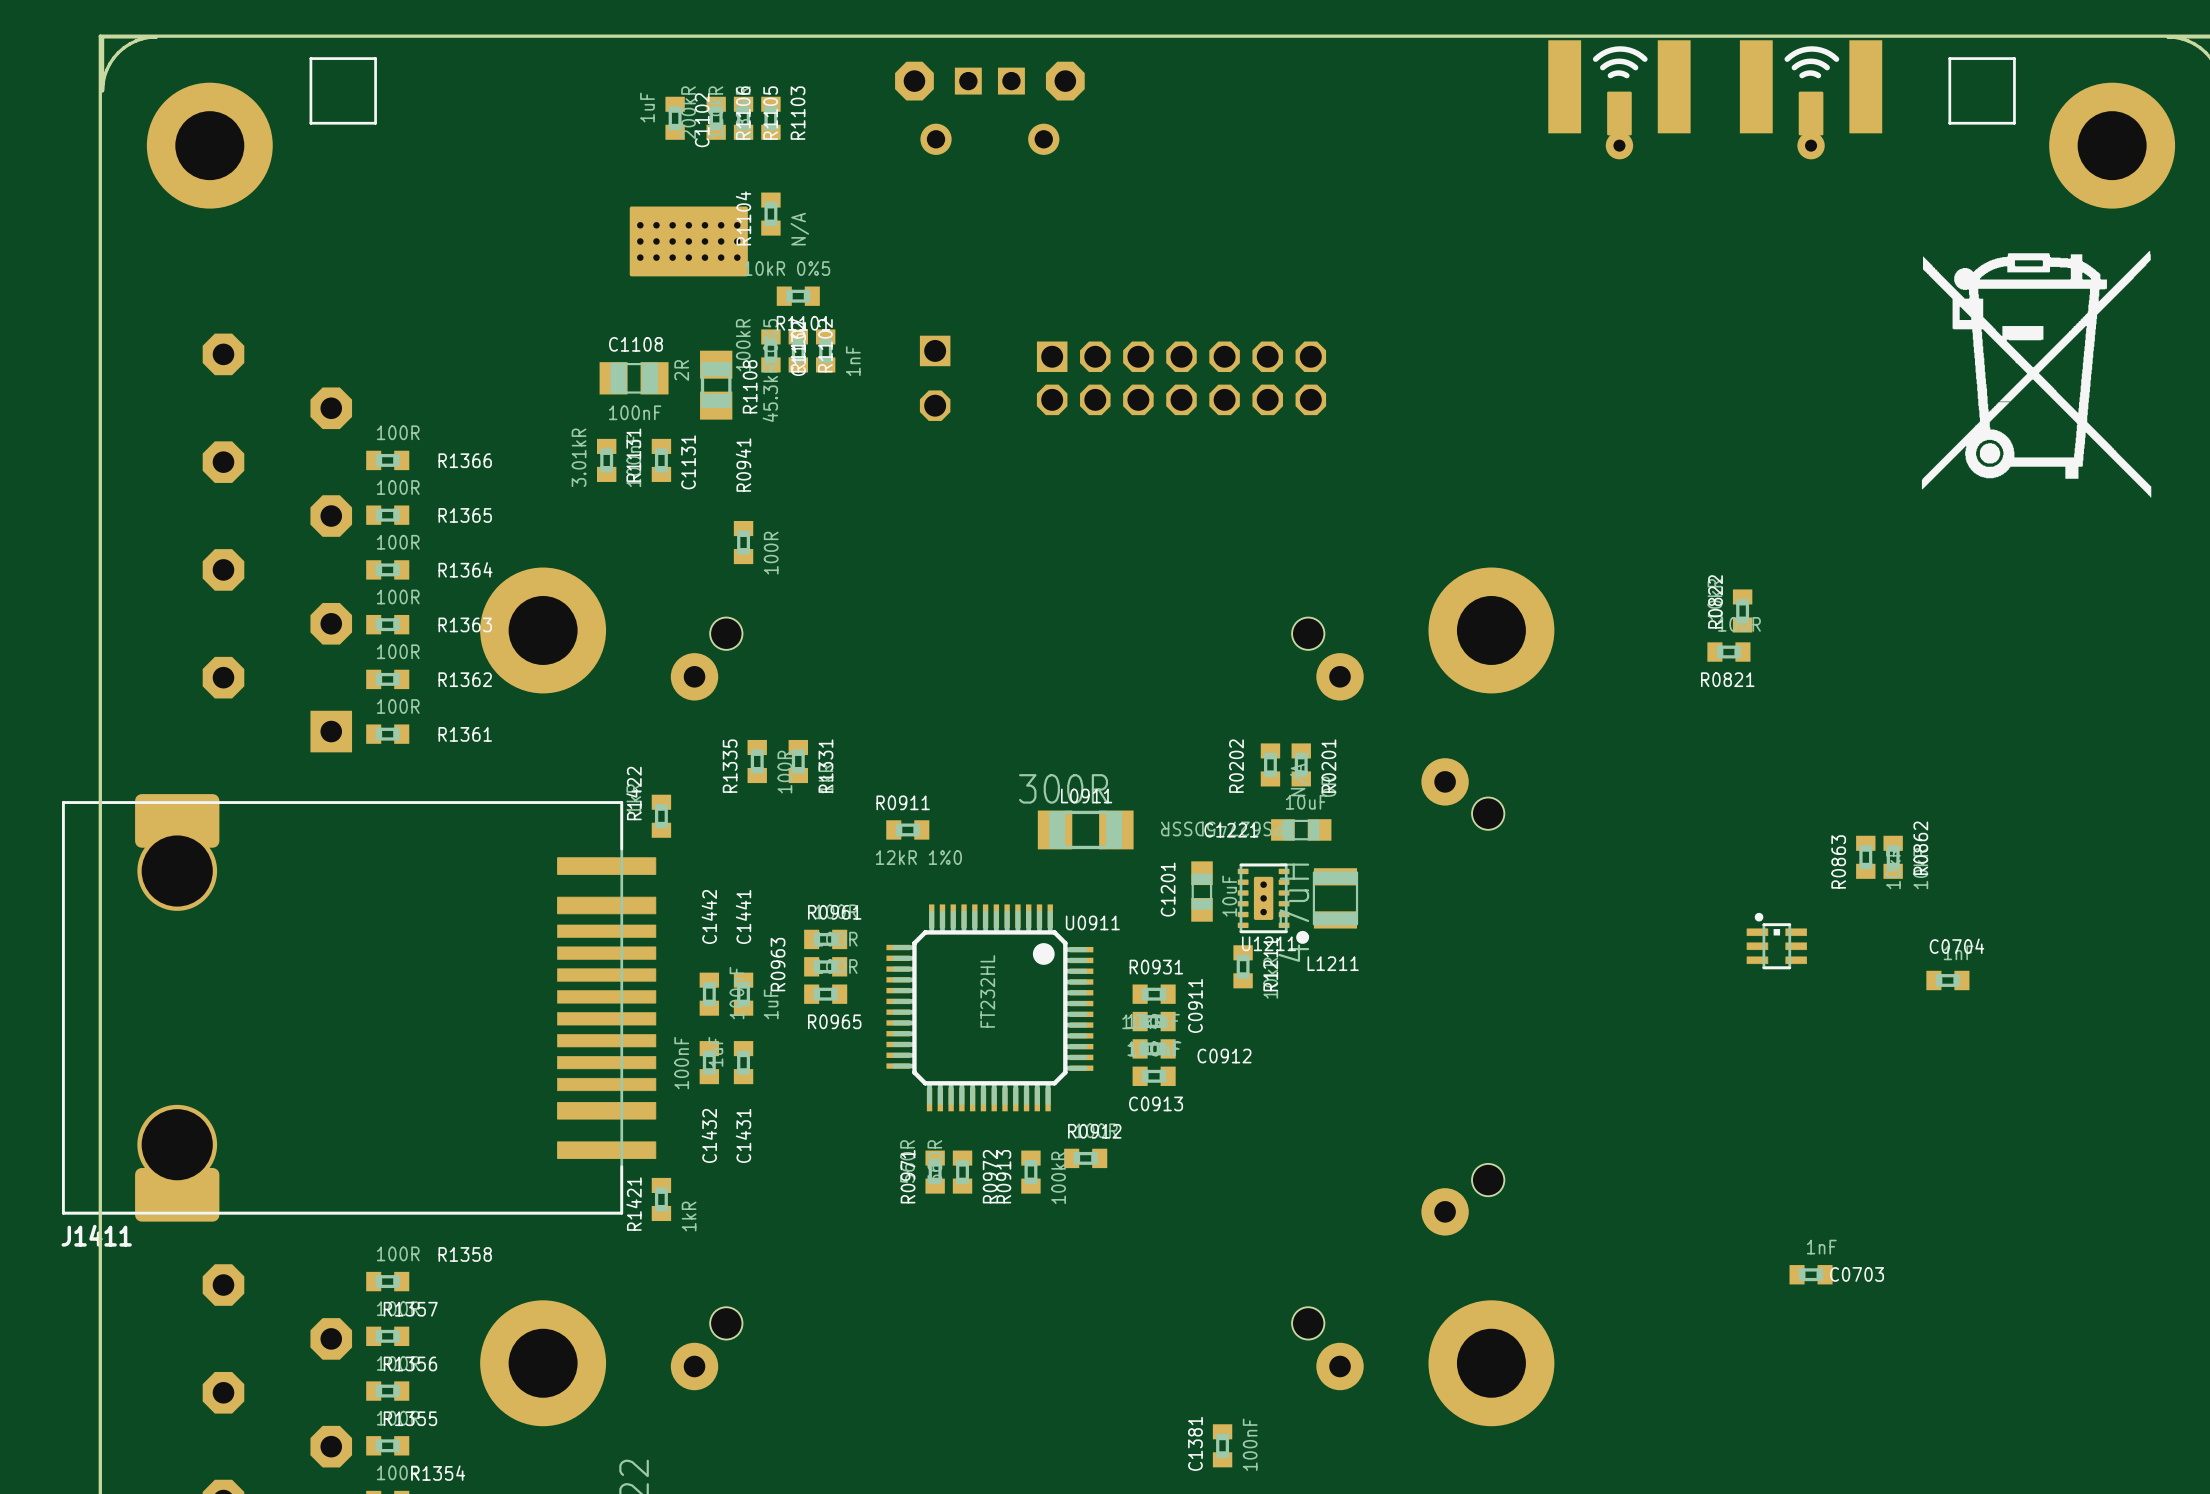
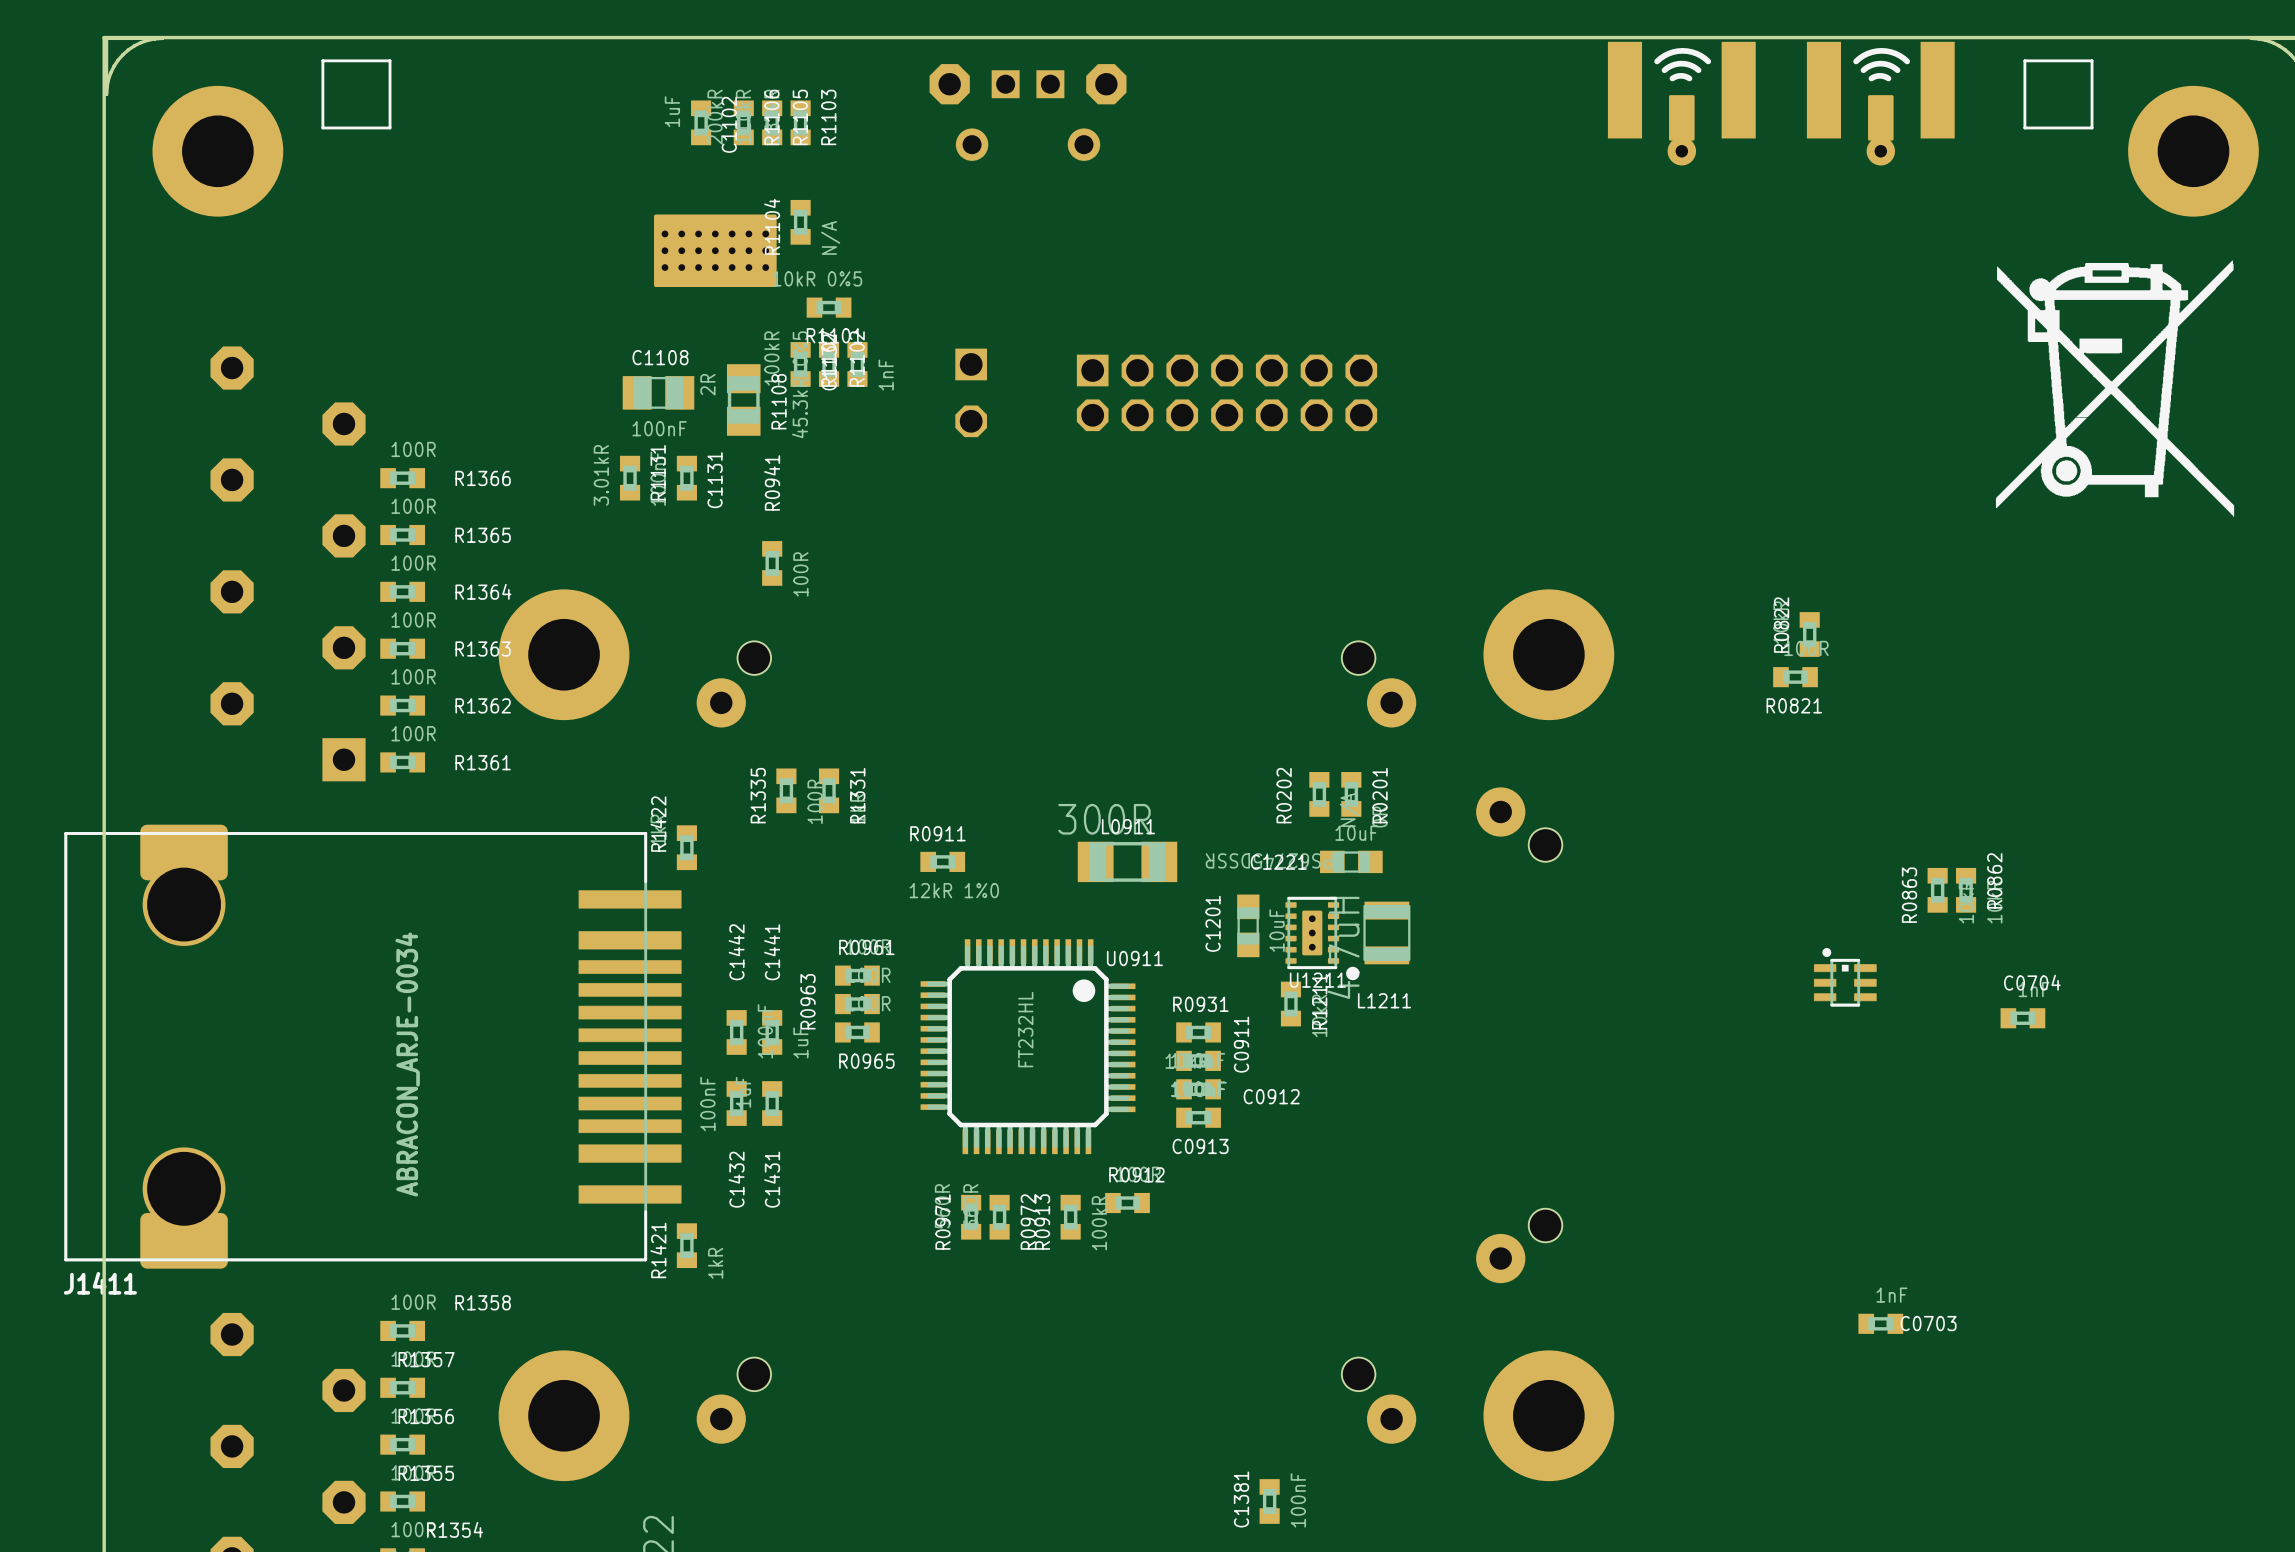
J1411 value: none -> ABRACON_ARJE-0034 (407, 1064)

